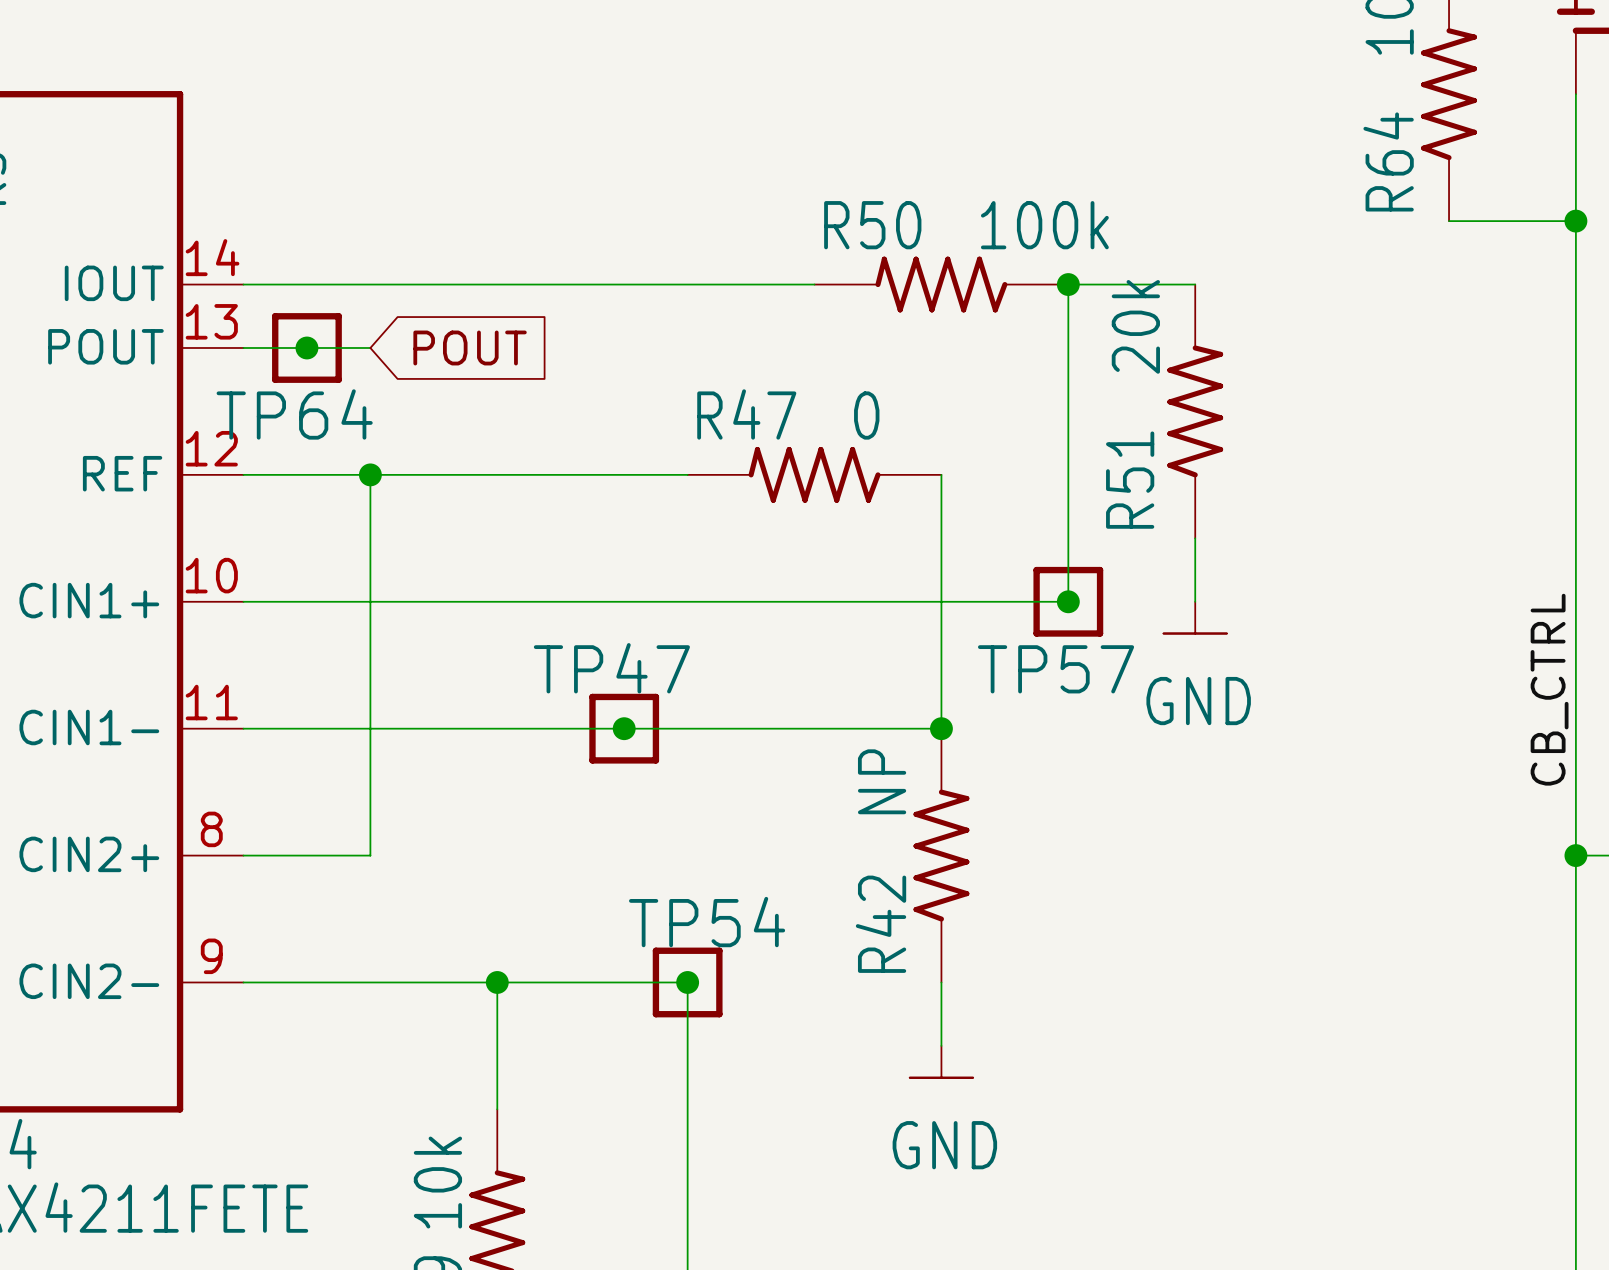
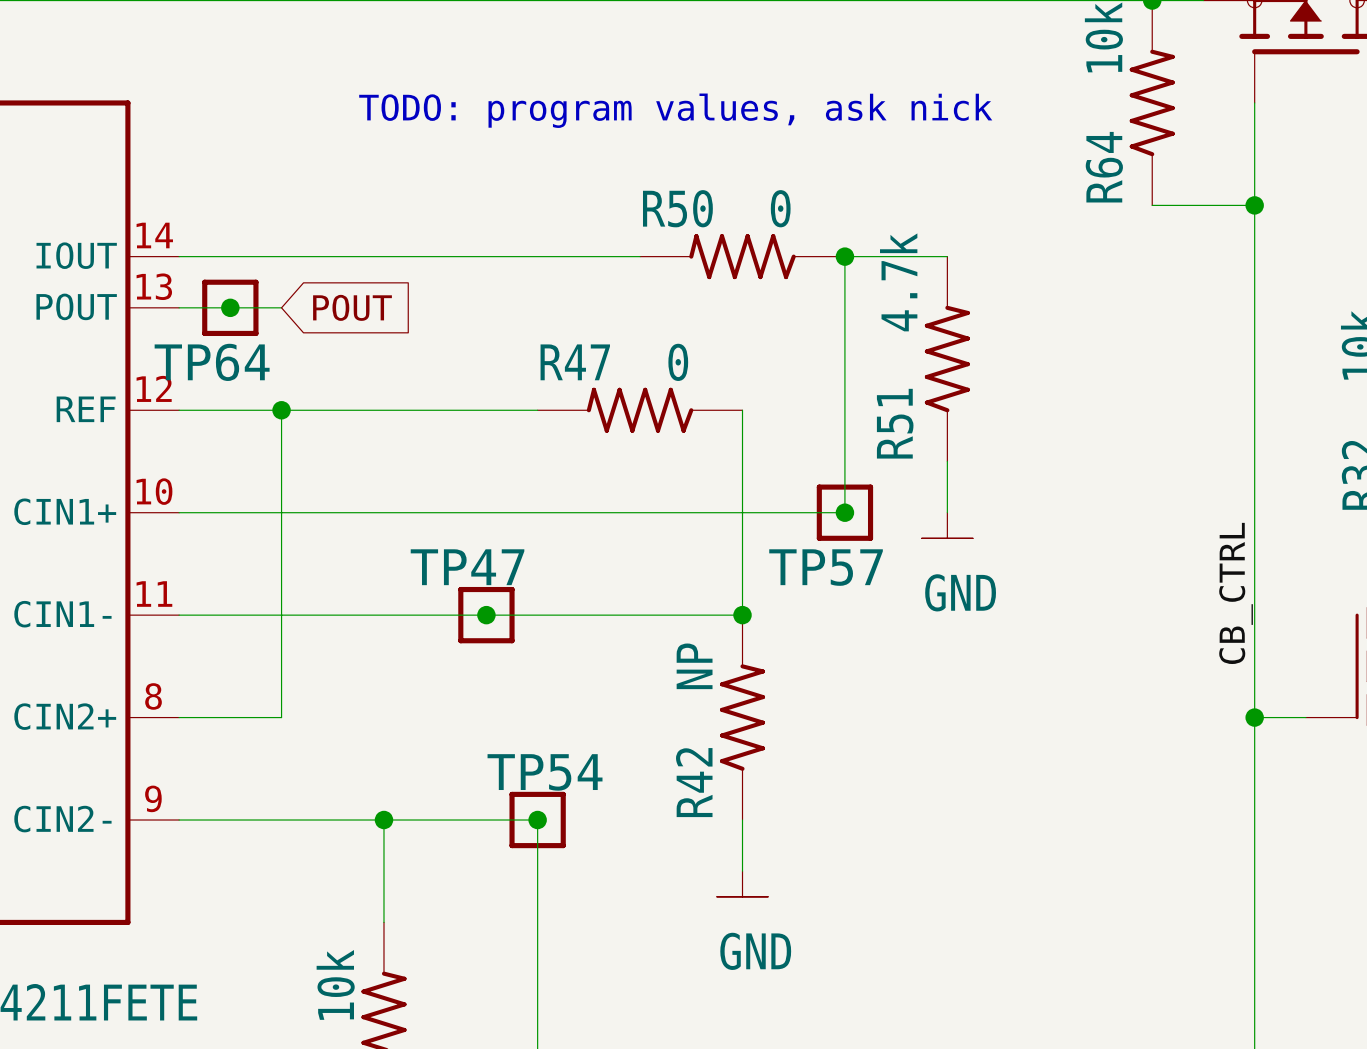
text: none -> TODO: program values, ask nick (675, 110)
R50 value: 100k (1044, 225) -> 0 (780, 208)
R51 value: 20k (1135, 326) -> 4.7k (898, 282)

